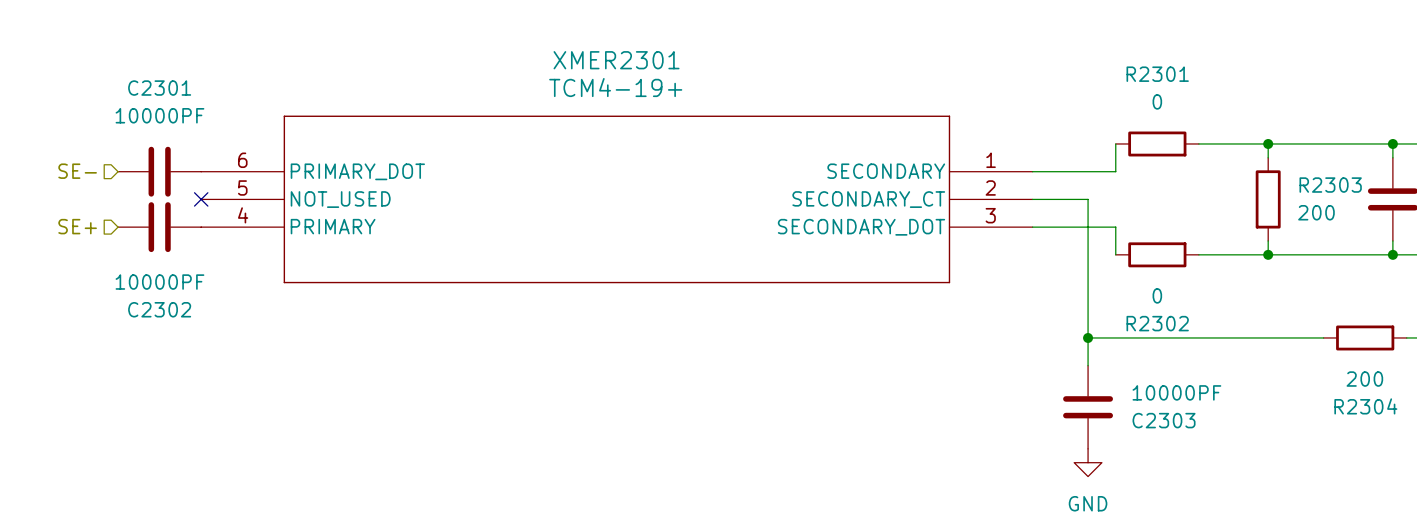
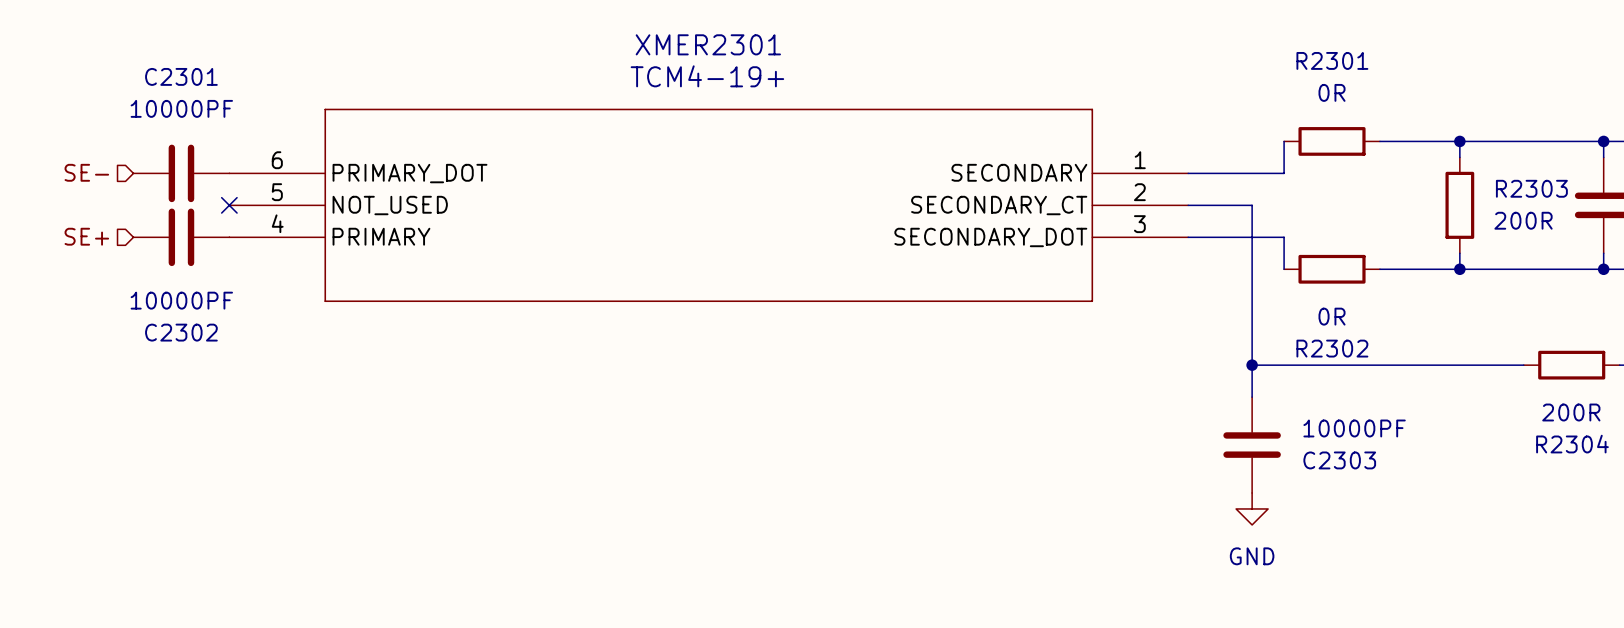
R2301 value: 0 (1157, 101) -> 0R (1332, 92)
R2303 value: 200 (1316, 212) -> 200R (1523, 220)
R2302 value: 0 (1157, 295) -> 0R (1332, 316)
R2304 value: 200 (1364, 379) -> 200R (1571, 412)

